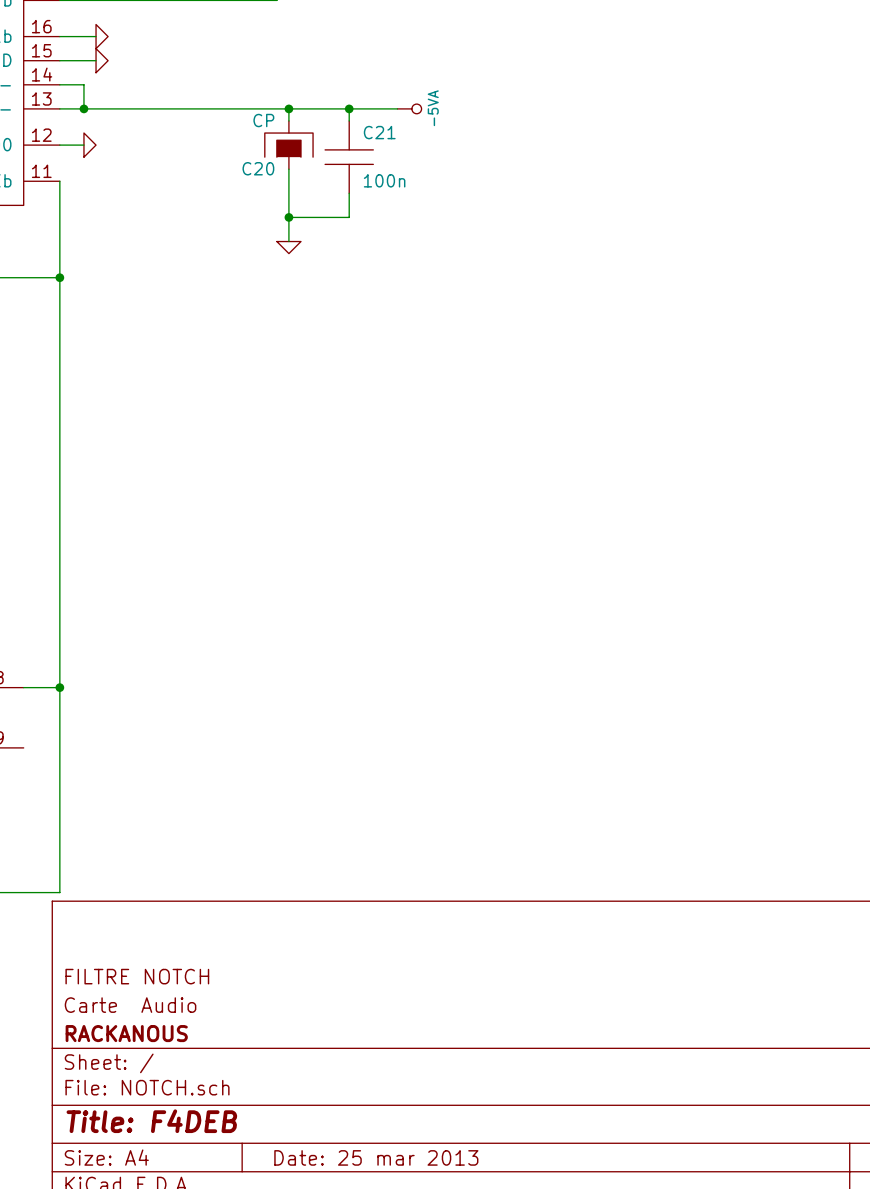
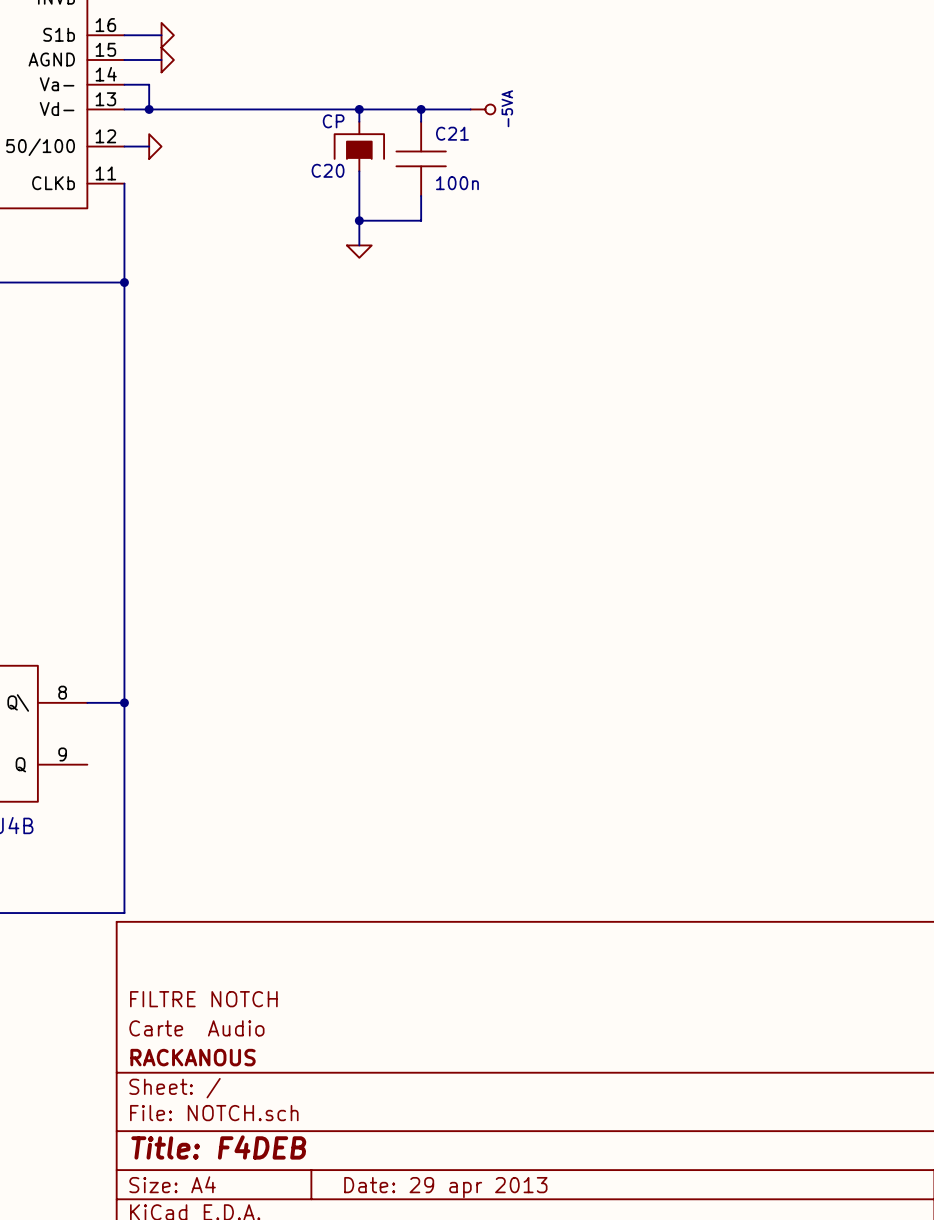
title block: Date: 25 mar 2013 (376, 1157) -> Date: 29 apr 2013 (445, 1187)

